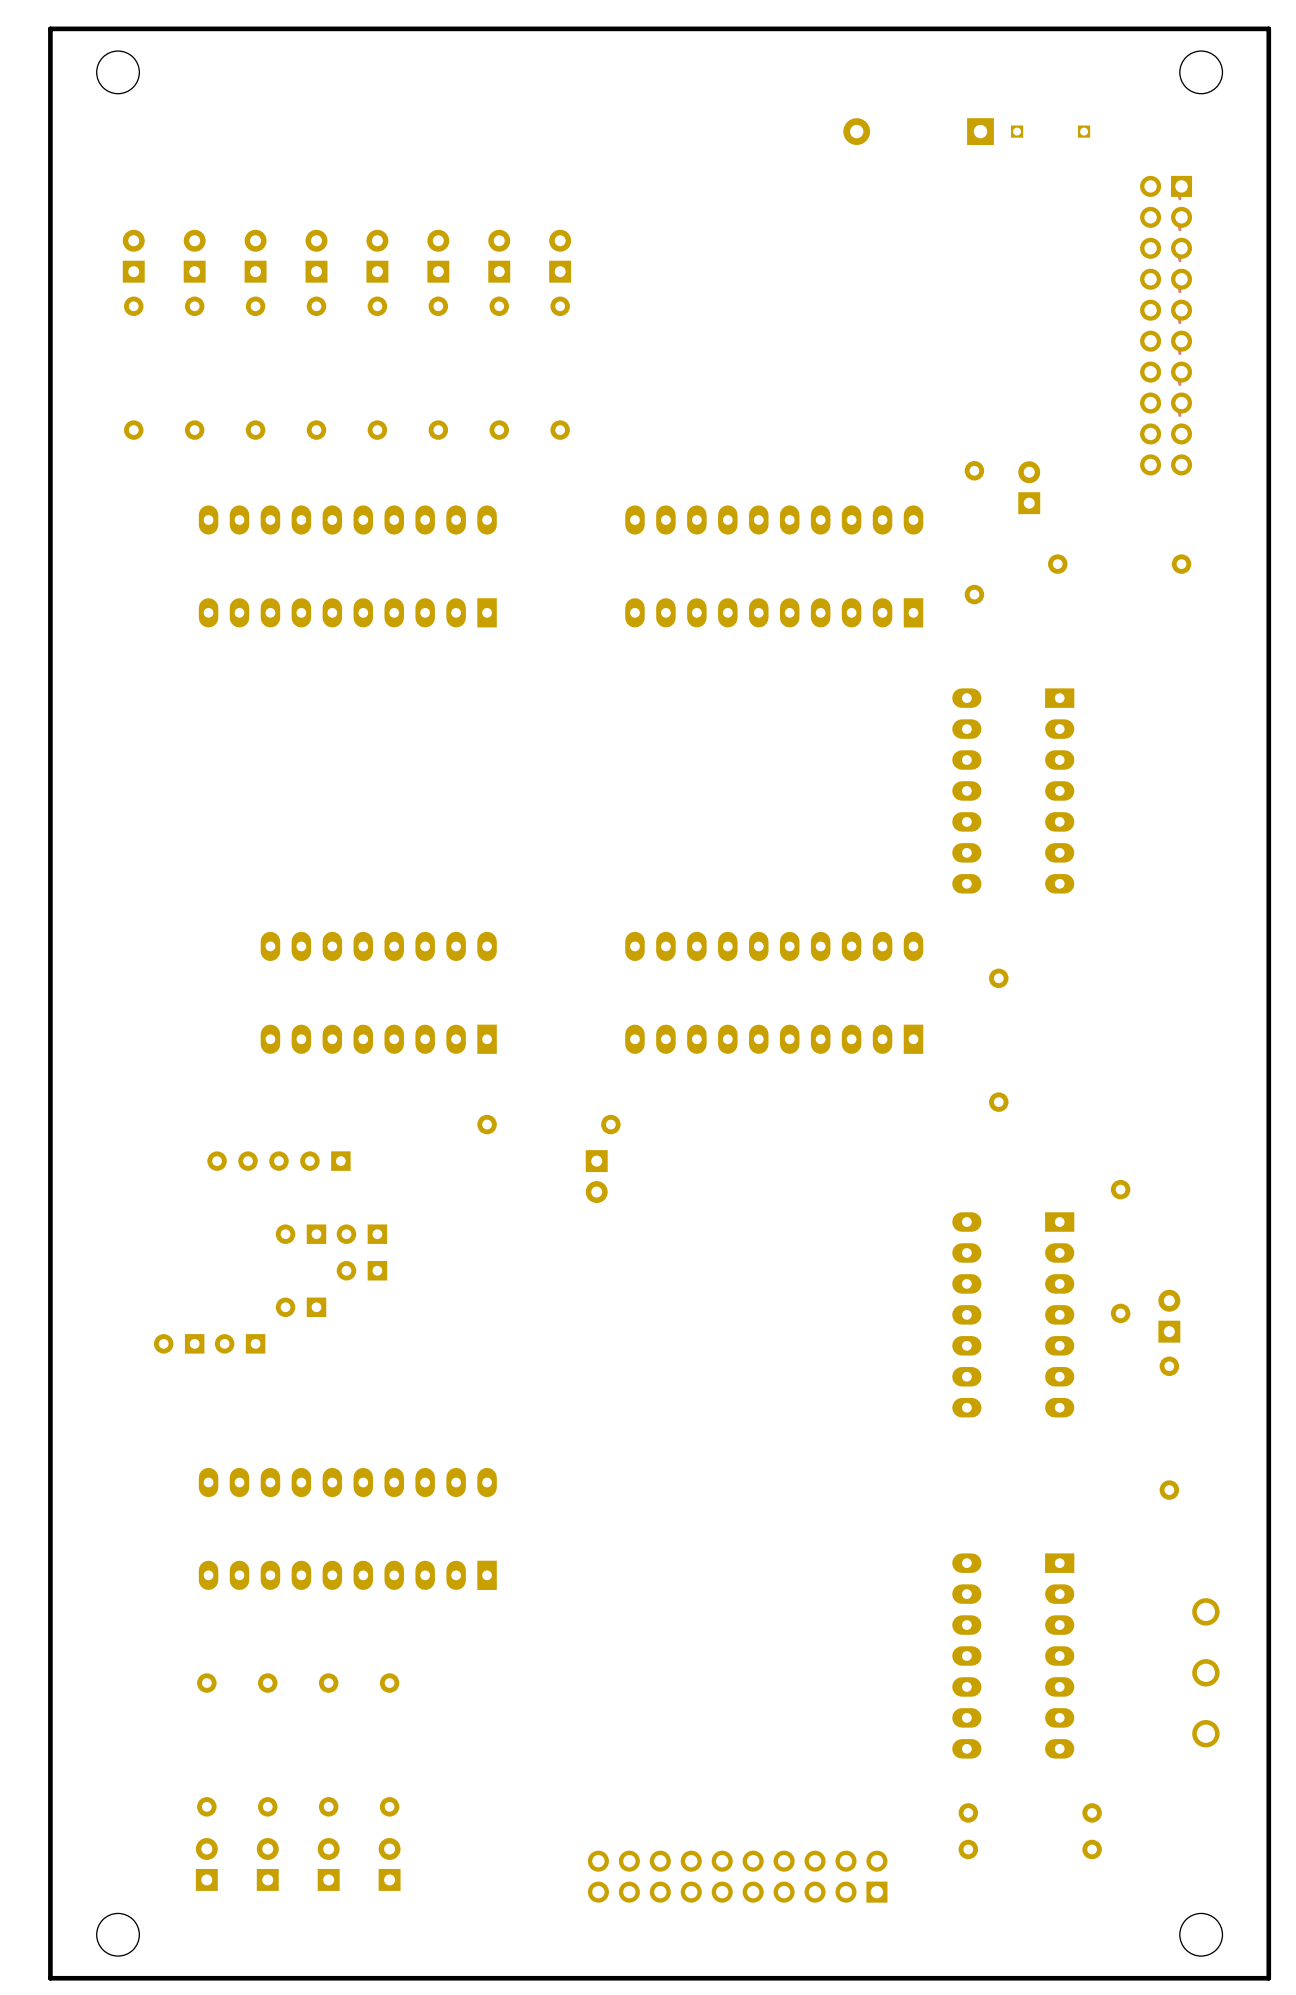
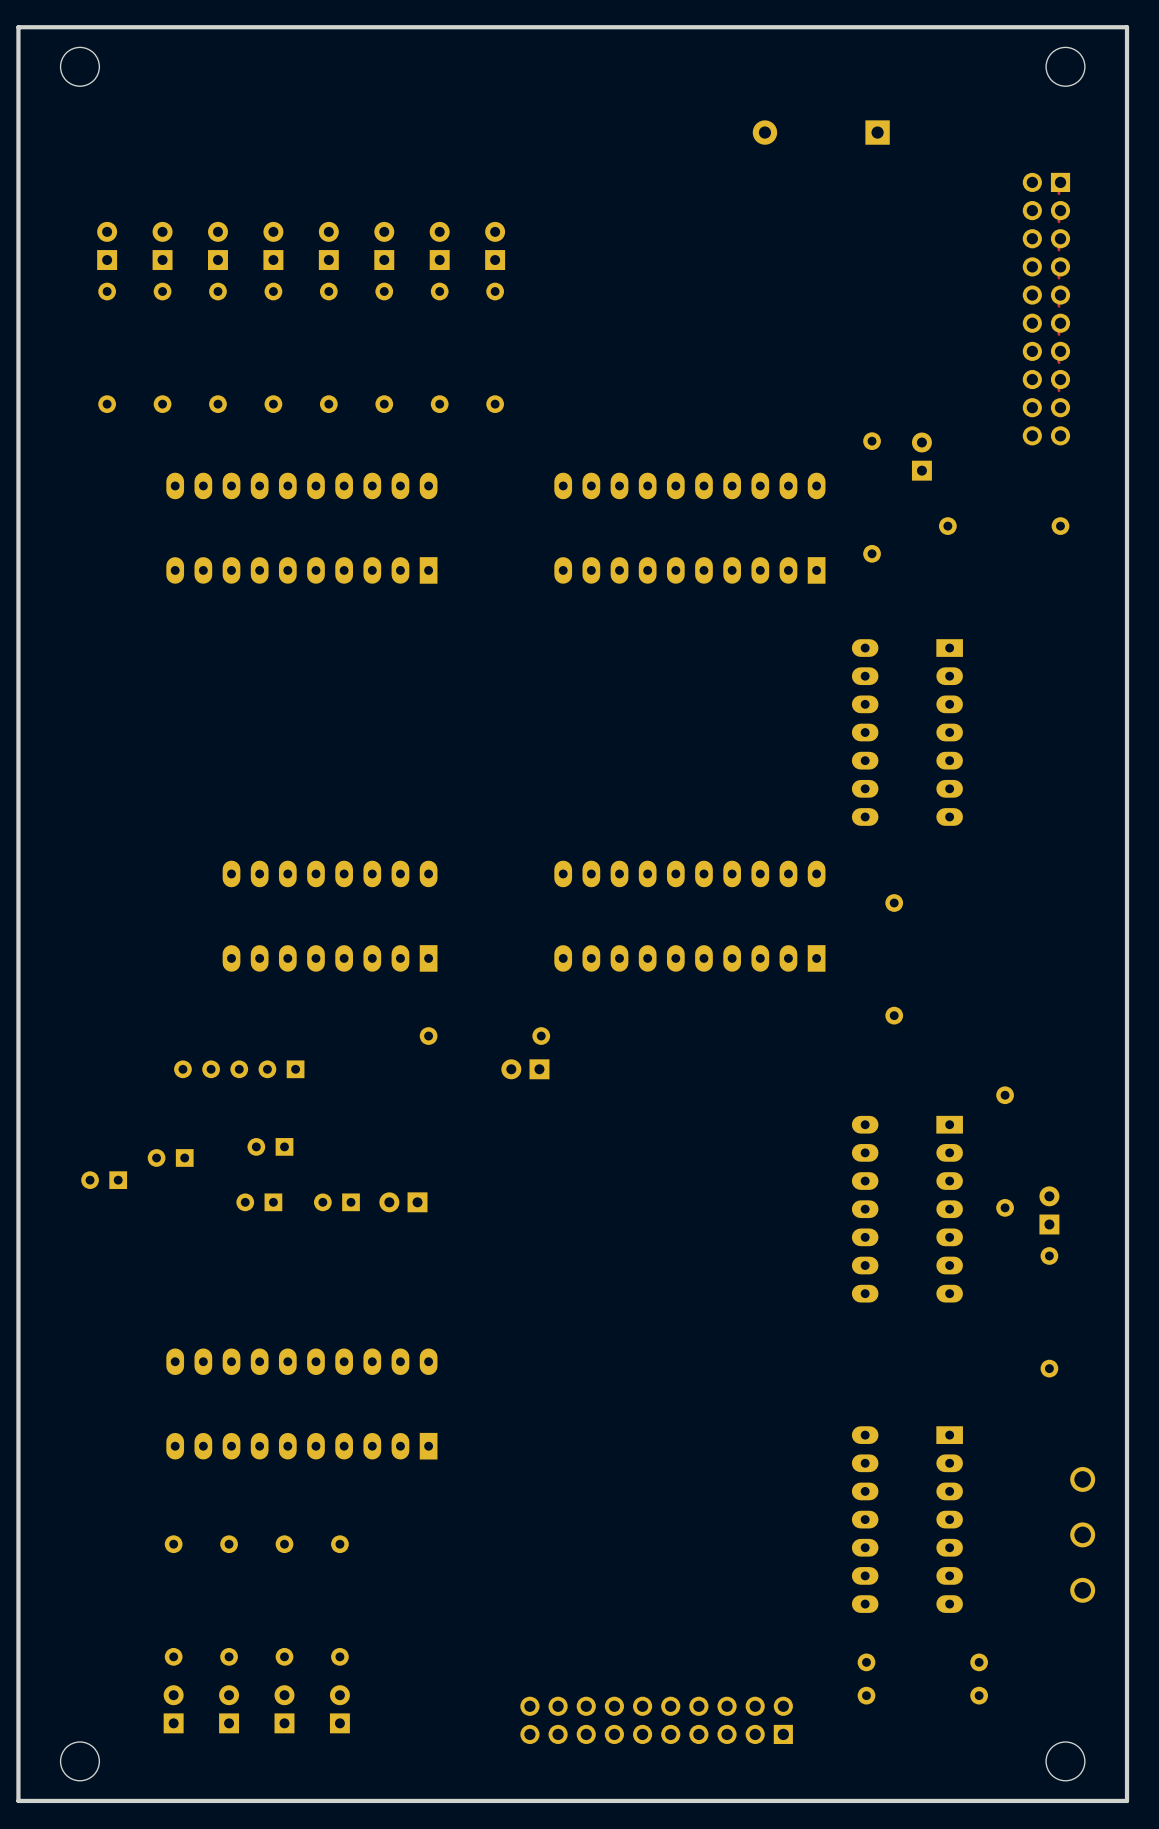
part: (1017, 131) -> none
part: (1084, 131) -> none
part position: (659, 1003) -> (572, 914)
part rotation: 0° (596, 1176) -> 90° clockwise (525, 1069)
part position: (301, 1234) -> (270, 1146)
part: (361, 1234) -> none
part: none -> (170, 1157)
part: (361, 1270) -> none
part: none -> (104, 1180)
part: none -> (336, 1202)
part: none -> (403, 1202)
part: (179, 1343) -> none
part: (240, 1343) -> none

